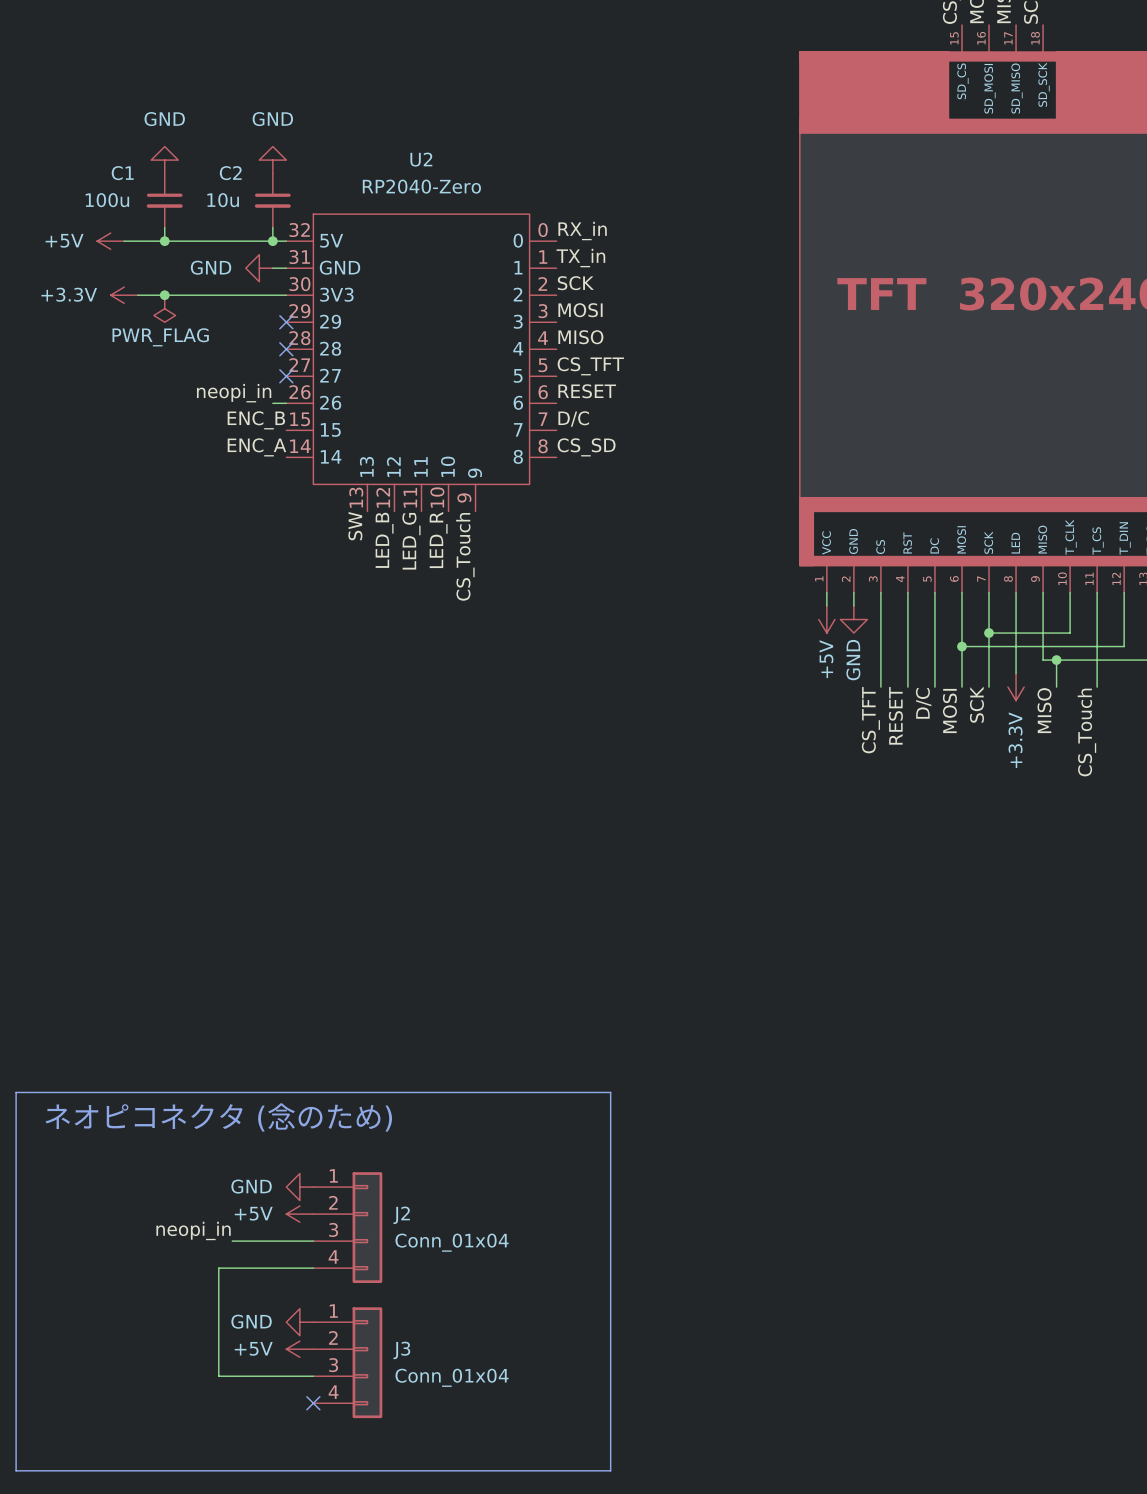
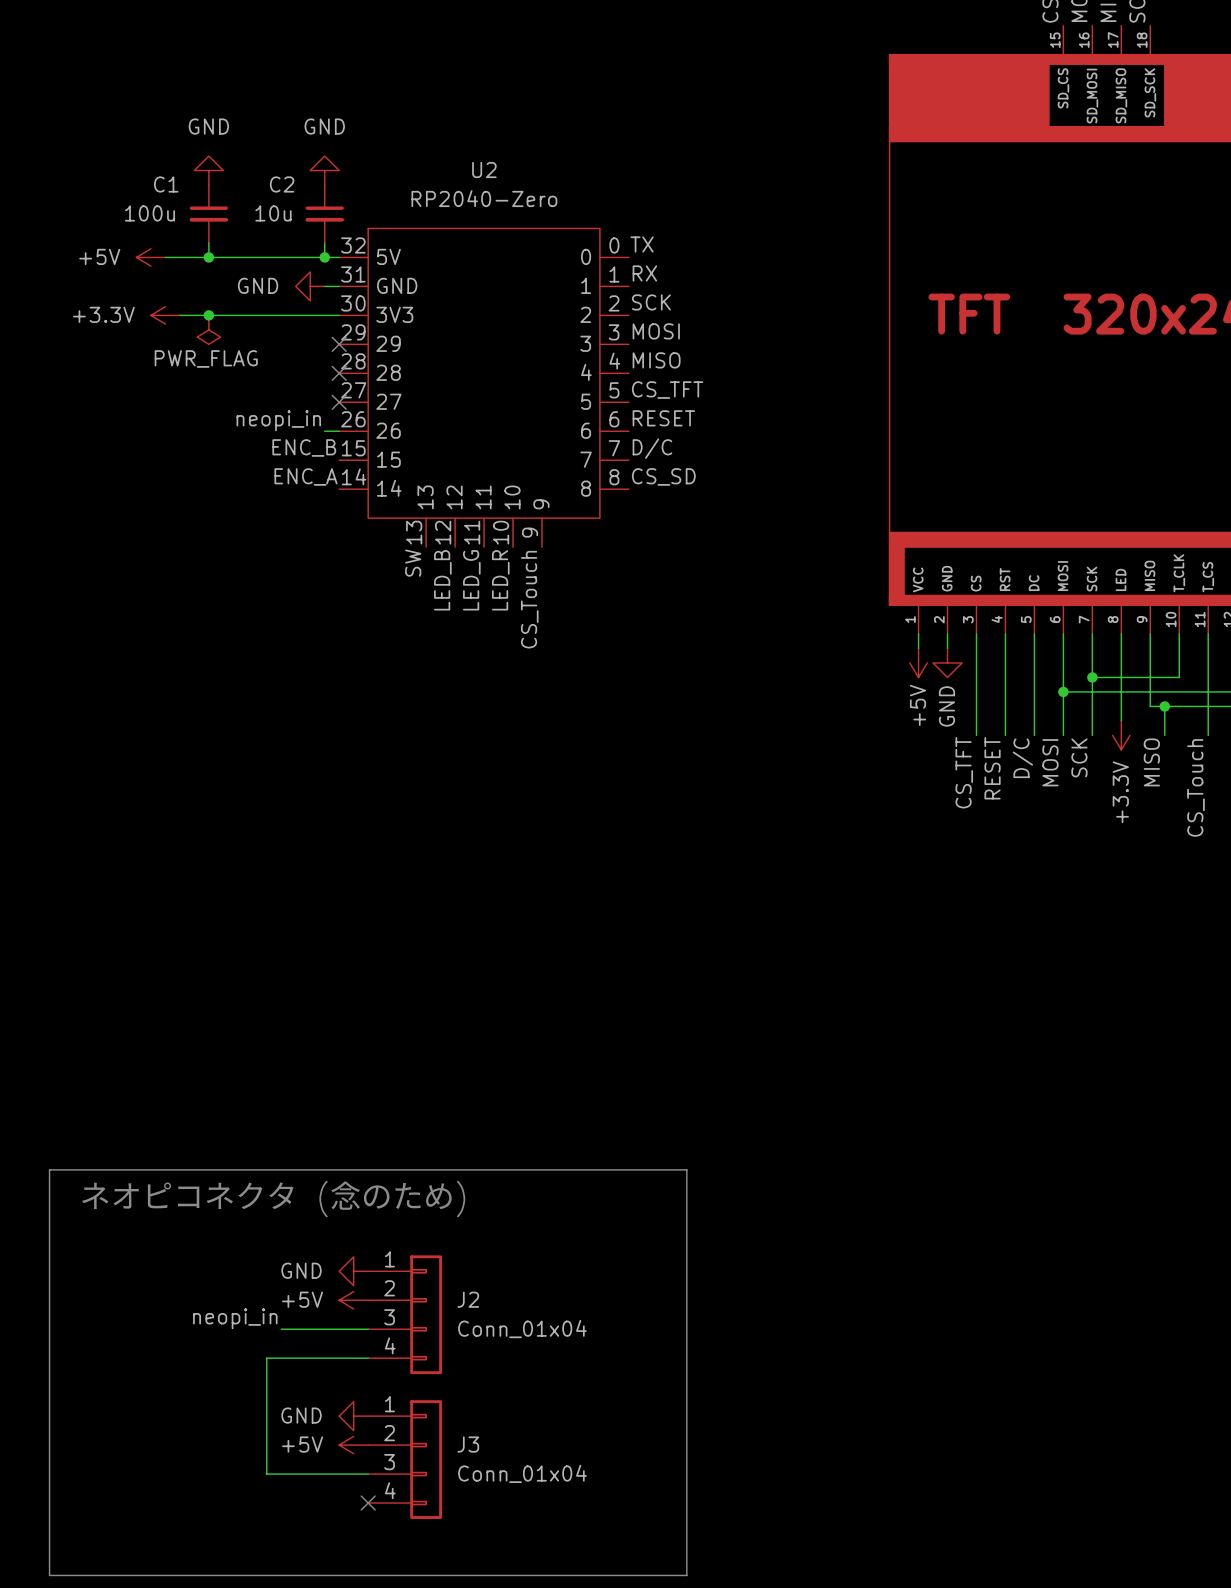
label: RX_in (582, 231) -> TX (642, 244)
label: TX_in (580, 258) -> RX (644, 273)

